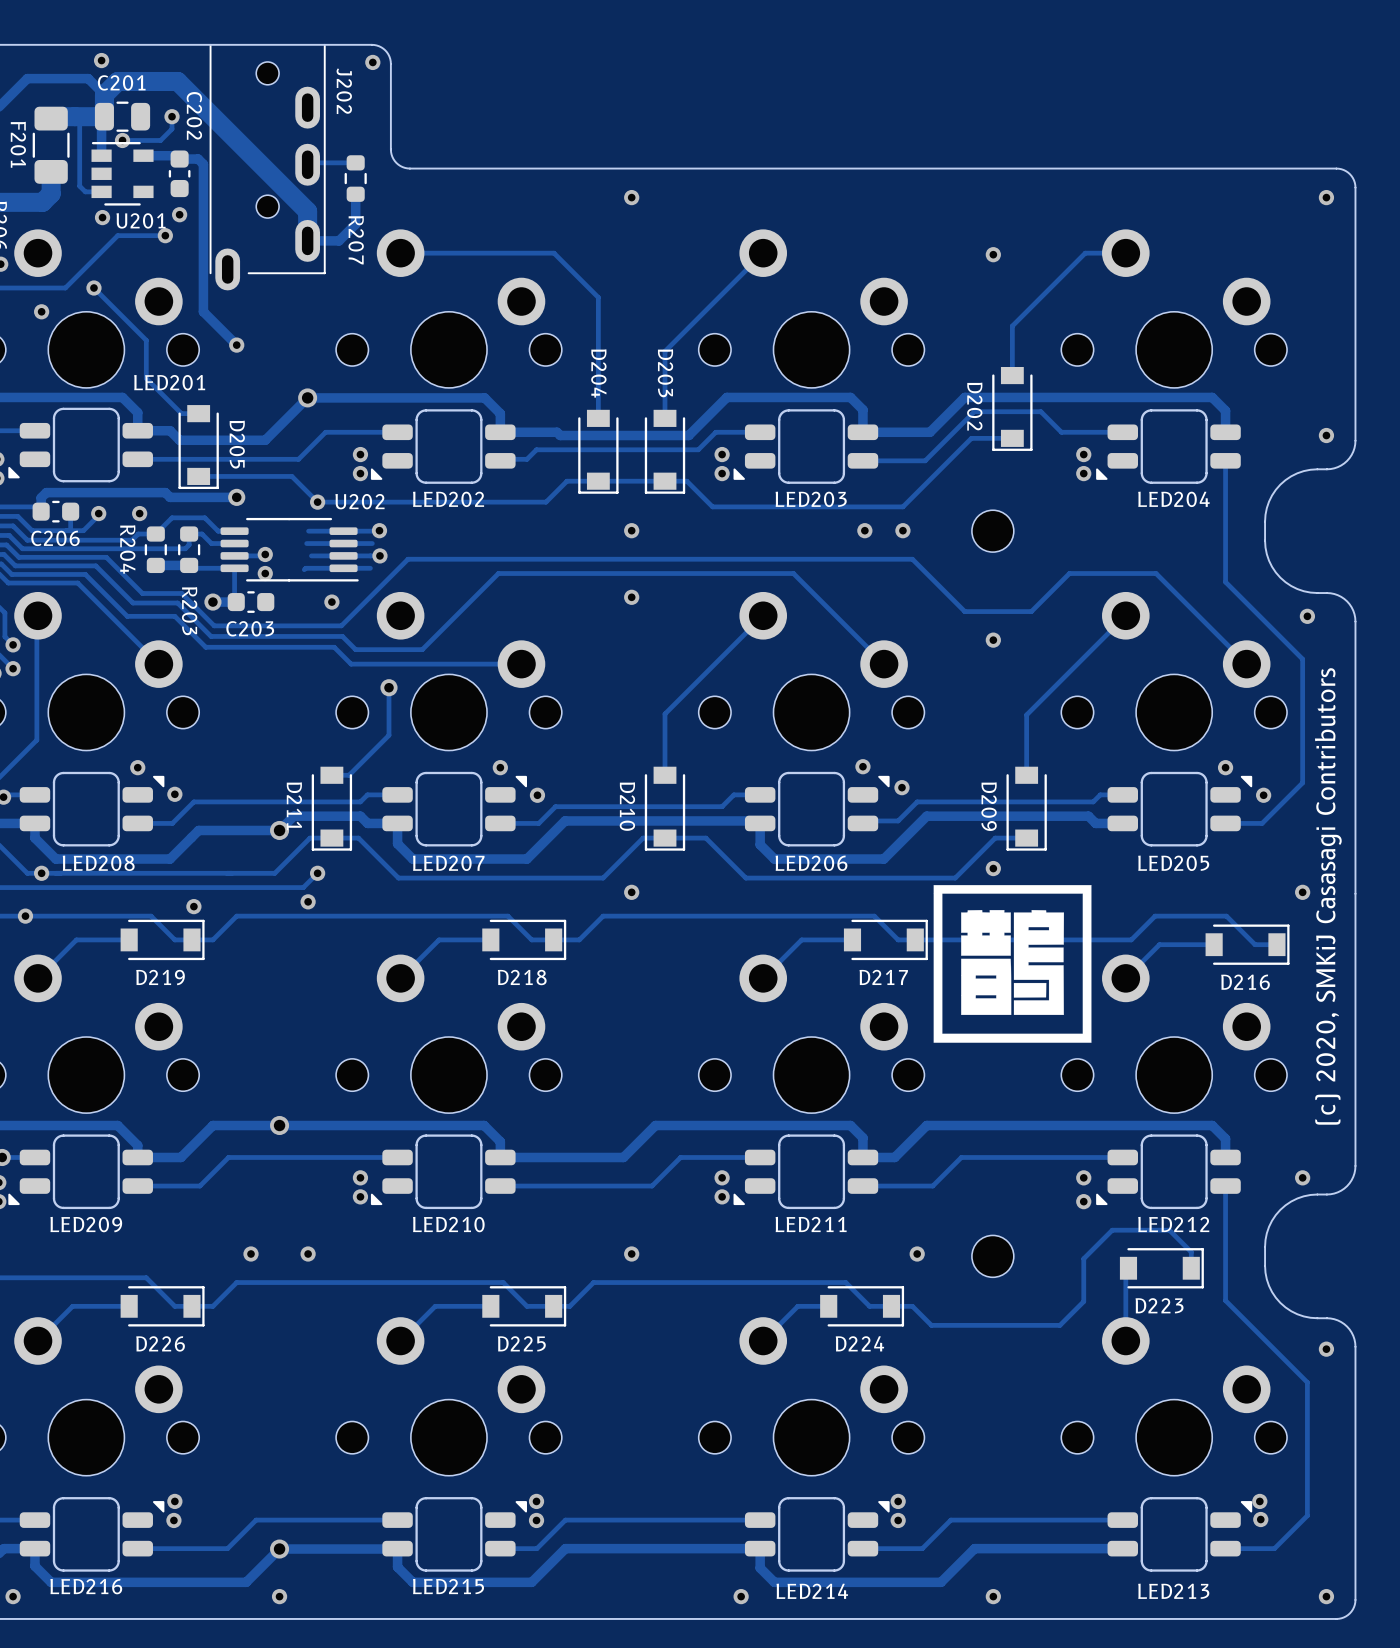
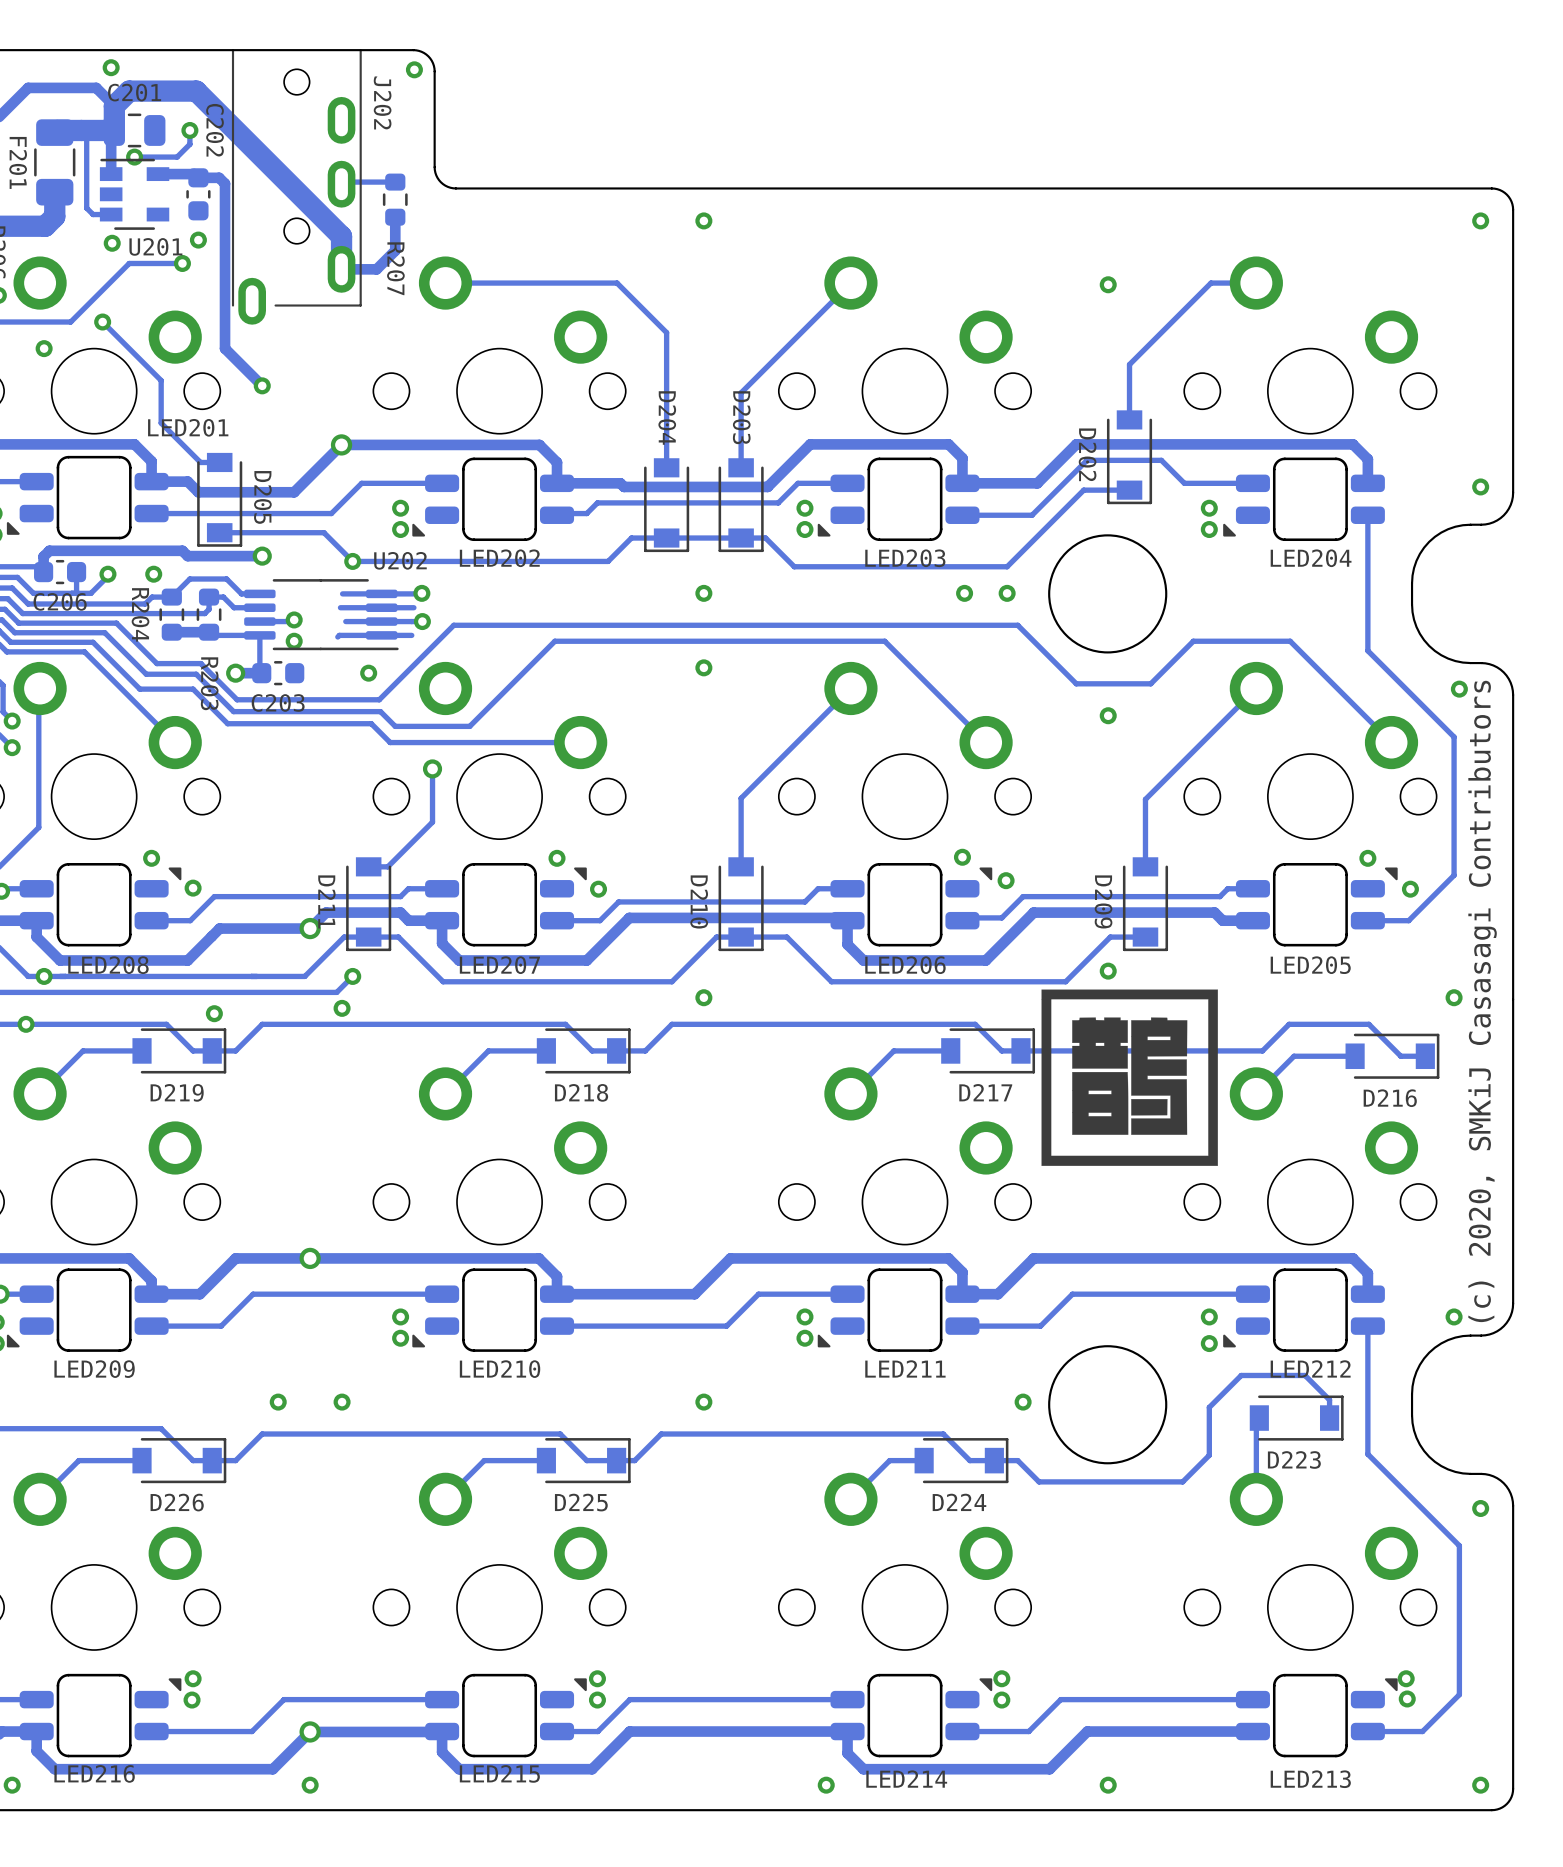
round board edge: none -> [1048, 534, 1168, 654]
part: (992, 531) -> none
round board edge: none -> [1048, 1345, 1168, 1465]
part: (992, 1256) -> none

